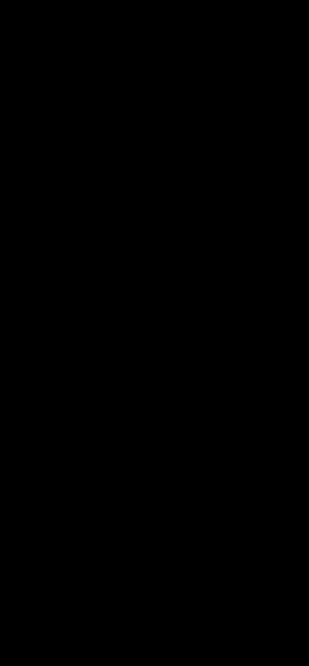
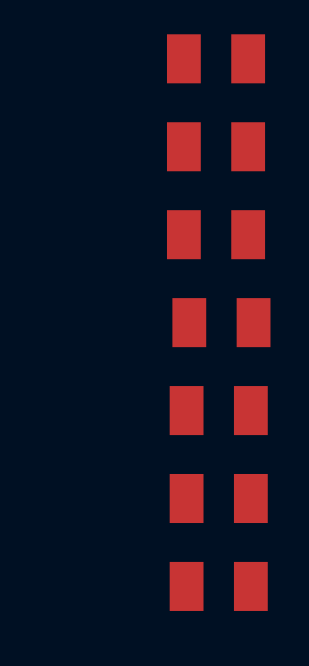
part: none -> (216, 58)
part: none -> (216, 146)
part: none -> (216, 234)
part: none -> (221, 322)
part: none -> (218, 410)
part: none -> (218, 498)
part: none -> (218, 586)

